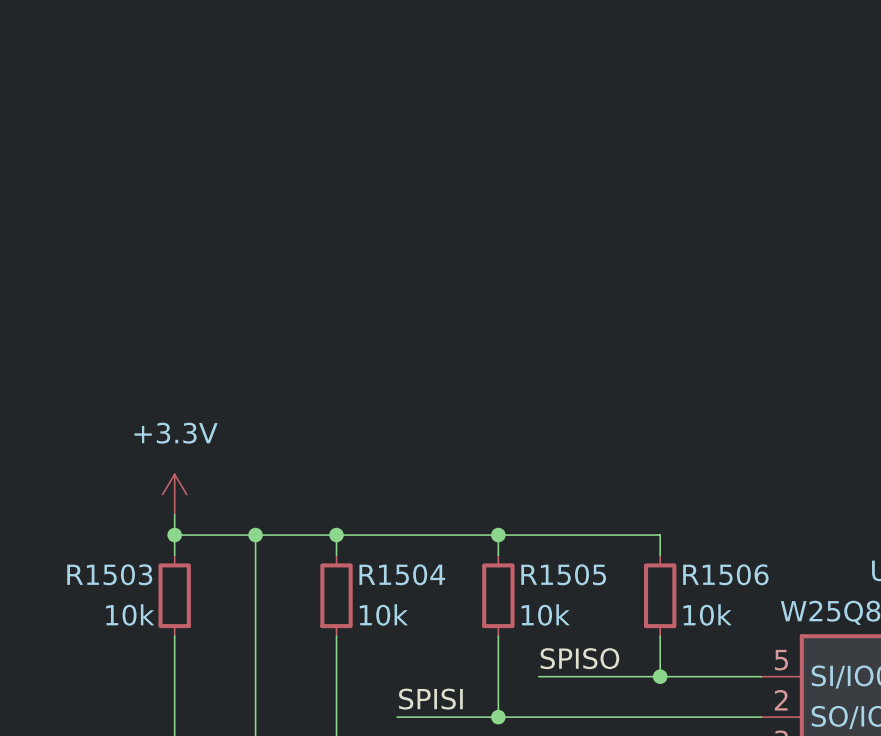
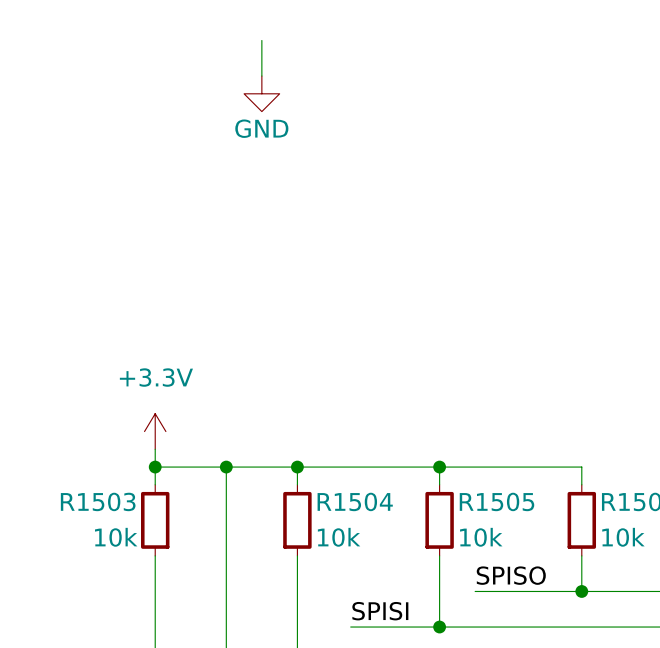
wire: none -> (261, 40) (261, 76)
power symbol: none -> GND (261, 93)

